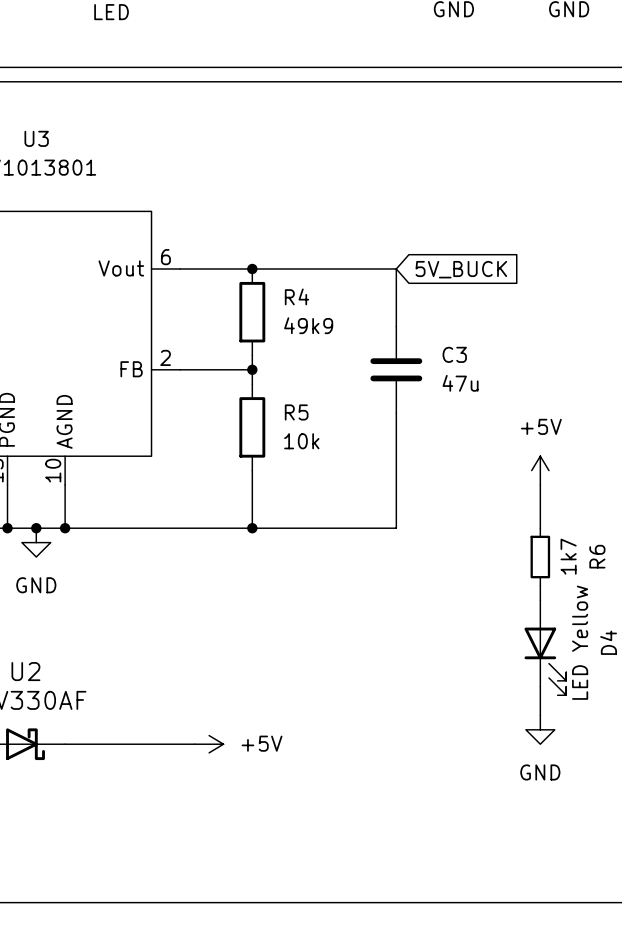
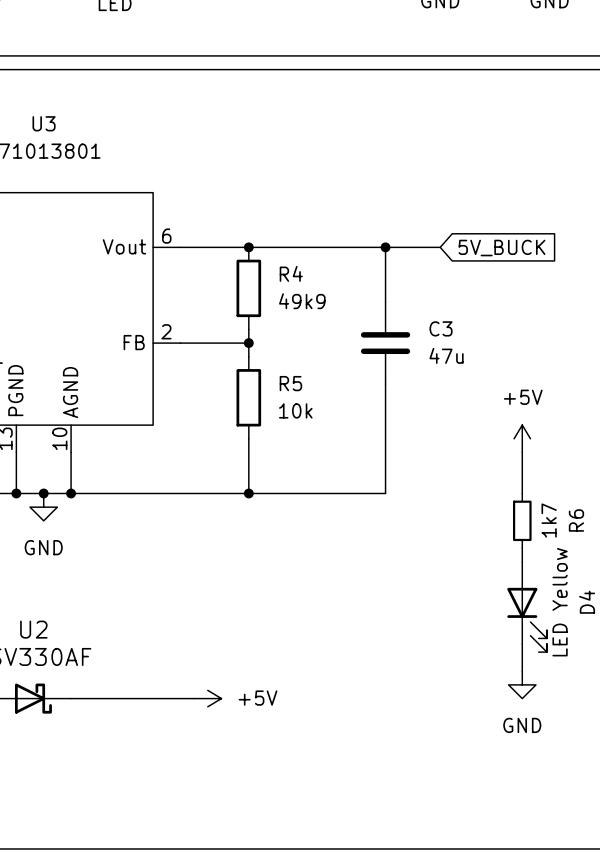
wire: none -> (385, 247) (440, 247)
junction: none -> (385, 247)
global label position: 5V_BUCK (461, 269) -> 5V_BUCK (501, 248)

